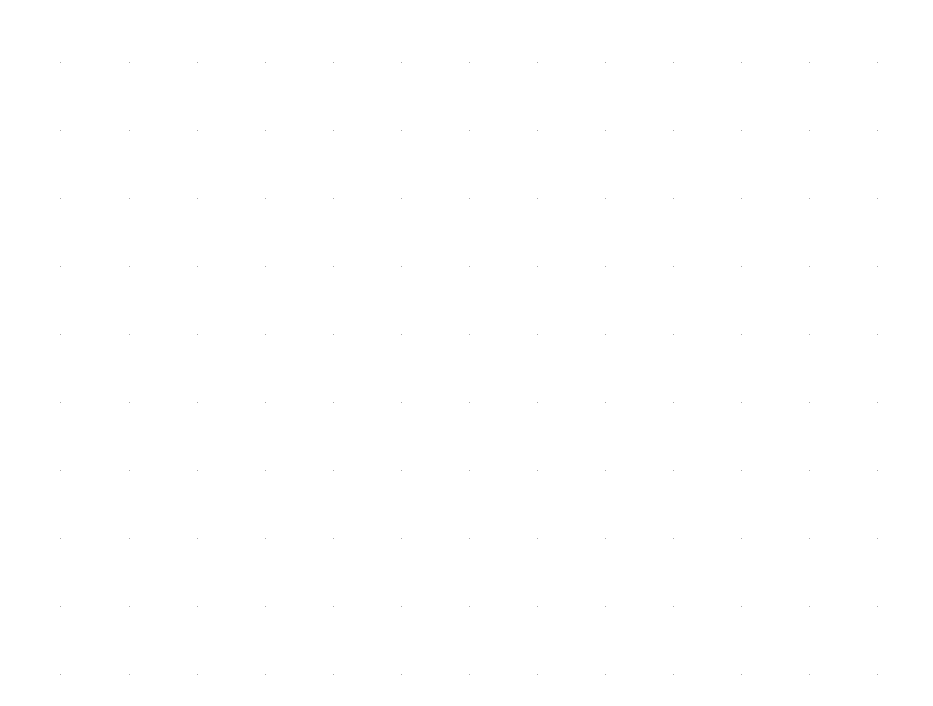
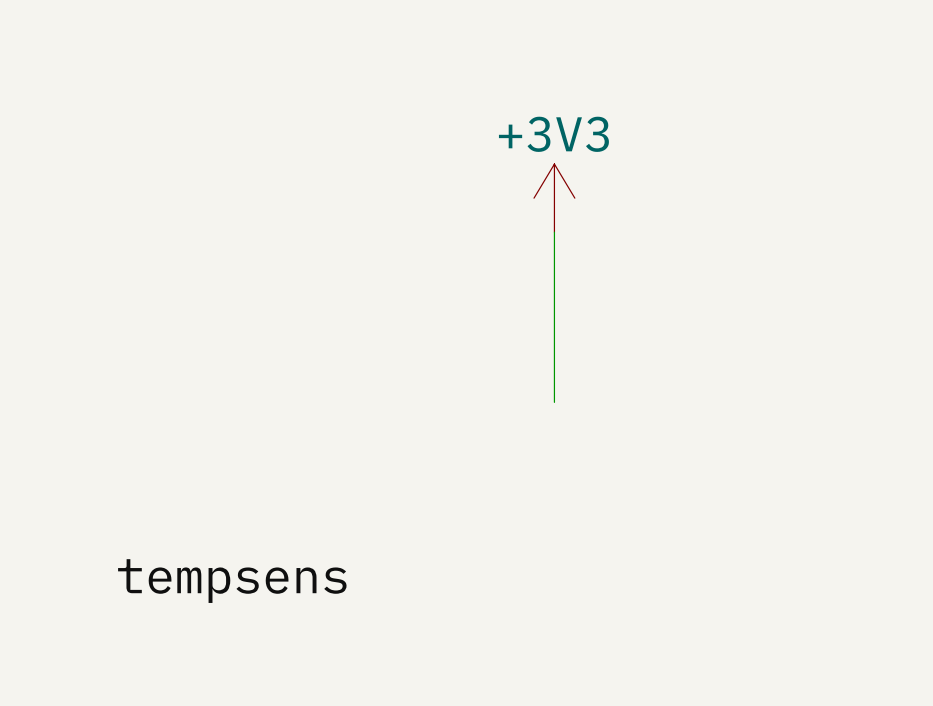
power symbol: none -> +3V3 (554, 198)
wire: none -> (554, 232) (554, 402)
label: none -> tempsens (232, 581)

